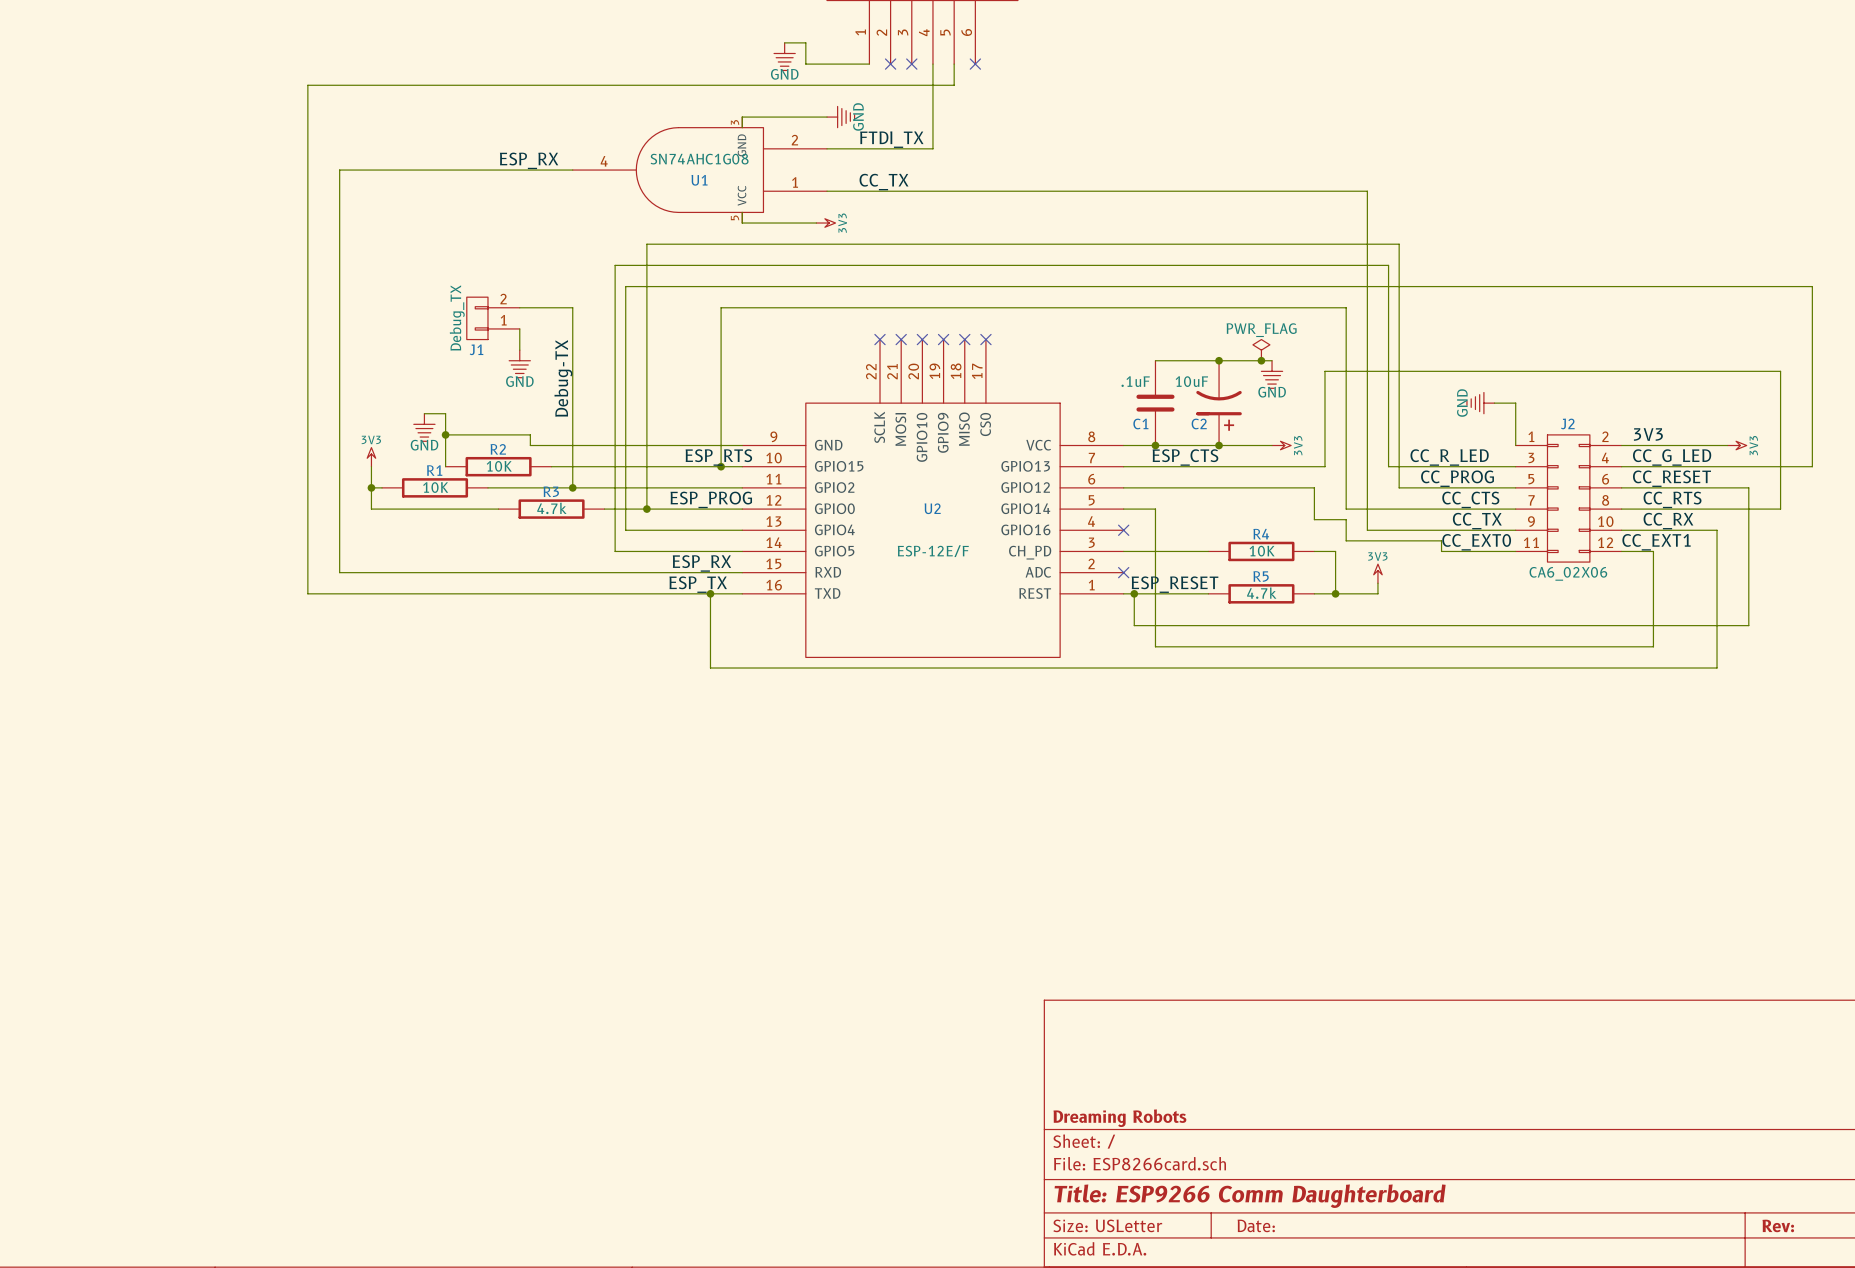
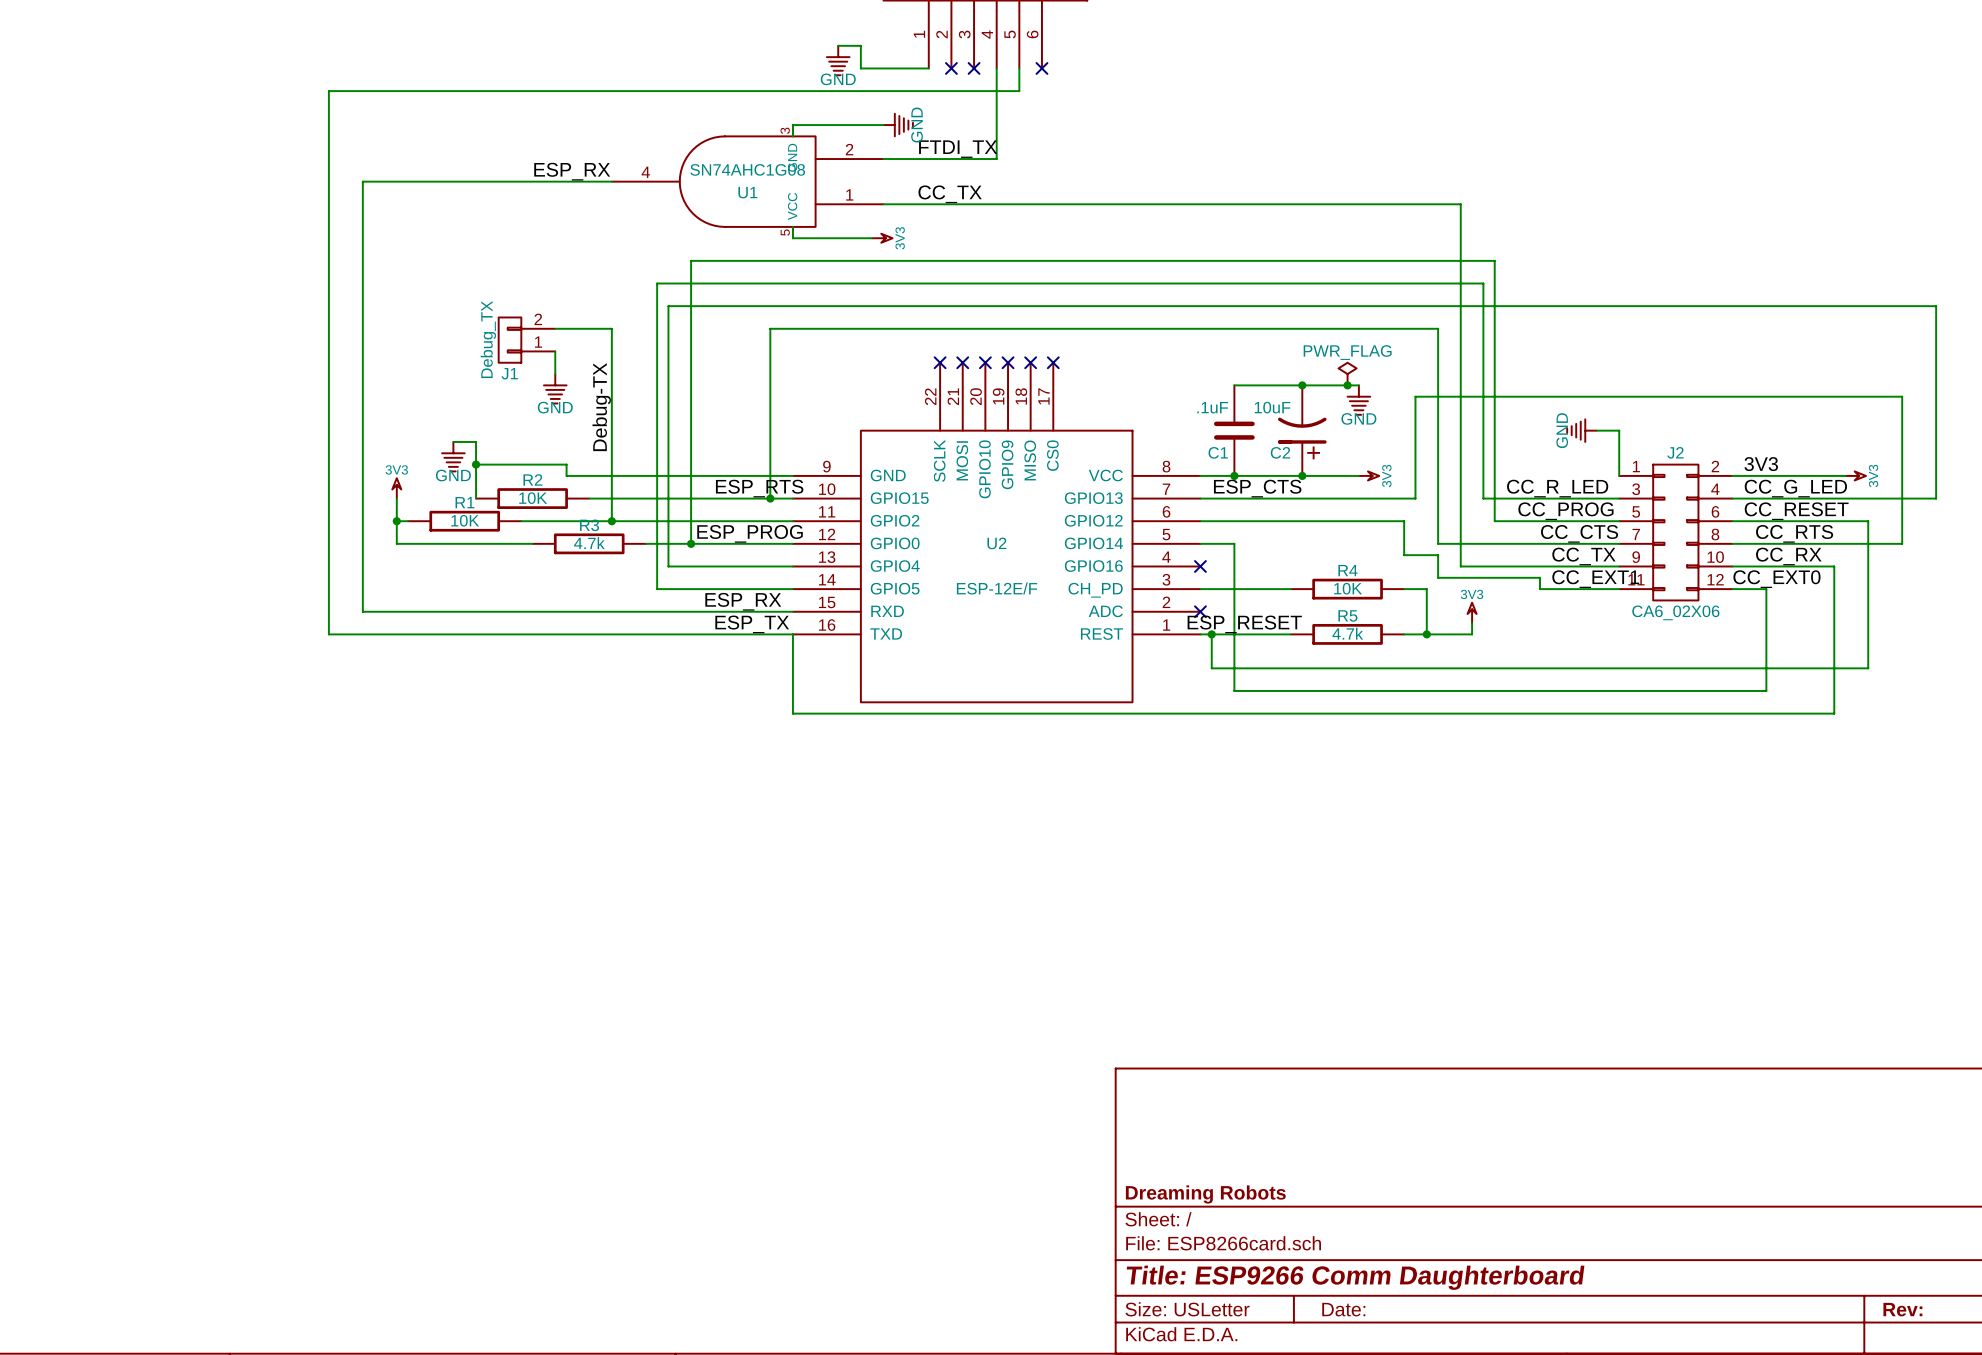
label: CC_EXT0 (1476, 542) -> CC_EXT1 (1595, 579)
label: CC_EXT1 (1656, 542) -> CC_EXT0 (1776, 579)
wire: (710, 593) (710, 668) (742, 668) -> (792, 634) (792, 713)
junction: (710, 593) -> none

